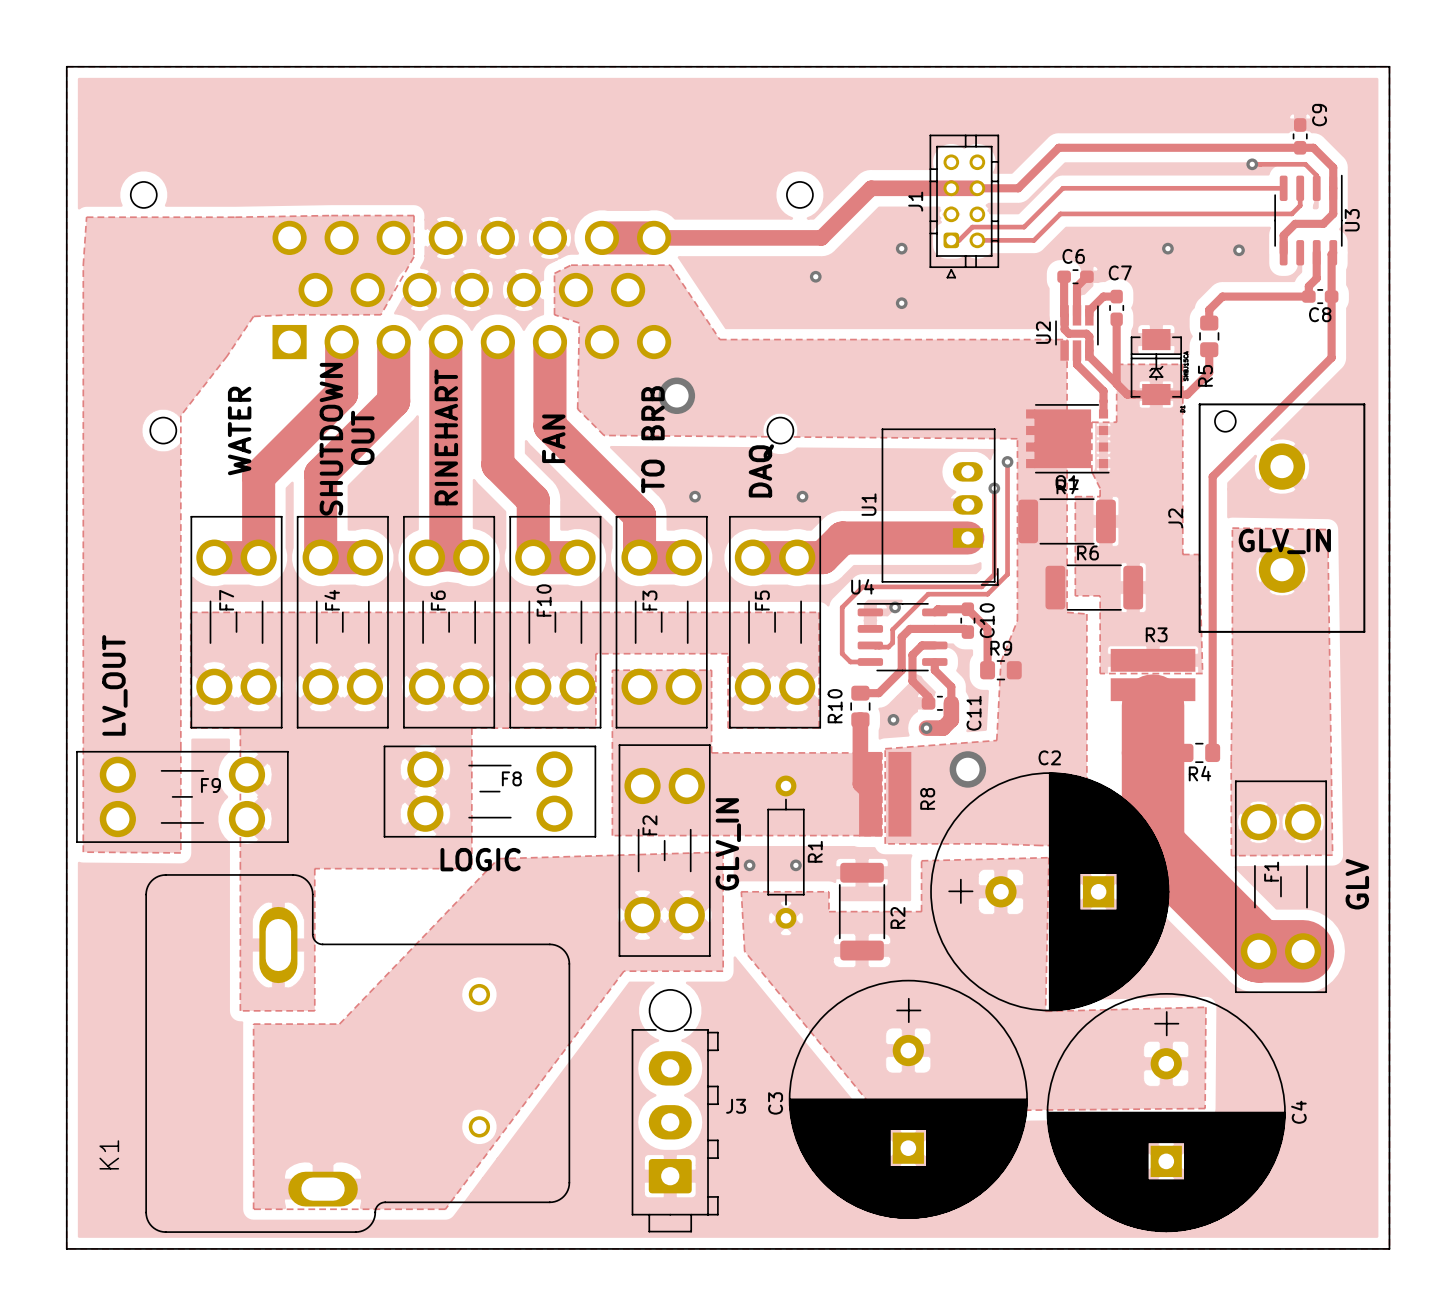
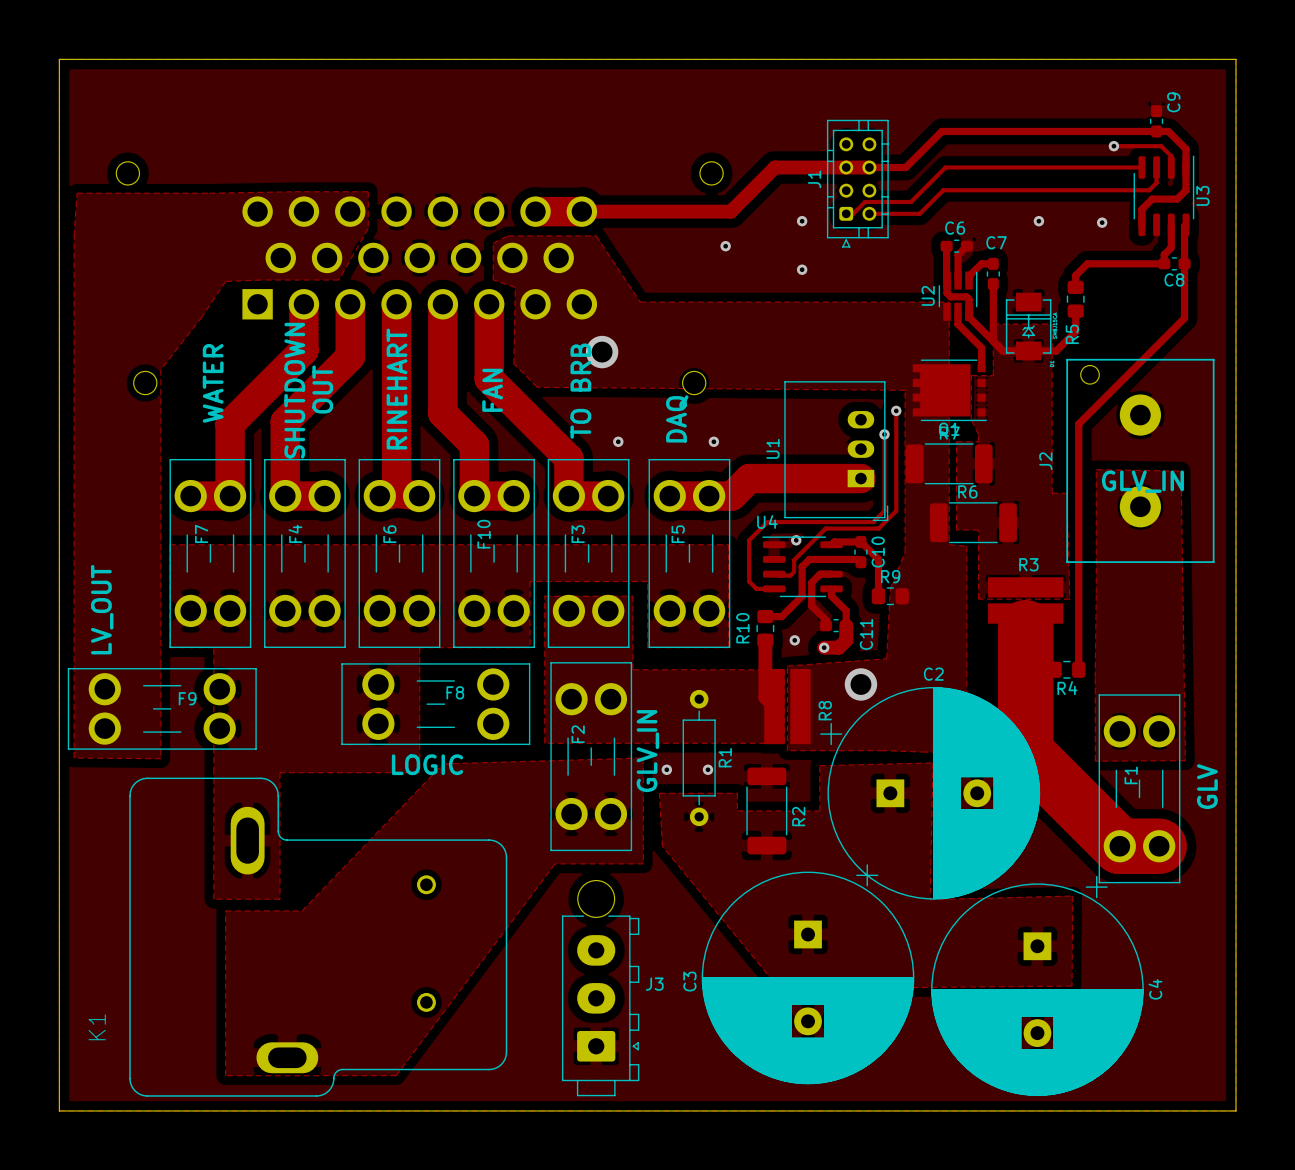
C2 footprint: [930, 772, 1170, 1012] -> [820, 686, 1041, 900]
C3 footprint: [788, 979, 1028, 1219] -> [701, 864, 915, 1085]
J3 footprint: [631, 989, 719, 1233] -> [561, 880, 640, 1097]
C4 footprint: [1046, 993, 1286, 1233] -> [931, 875, 1144, 1097]

